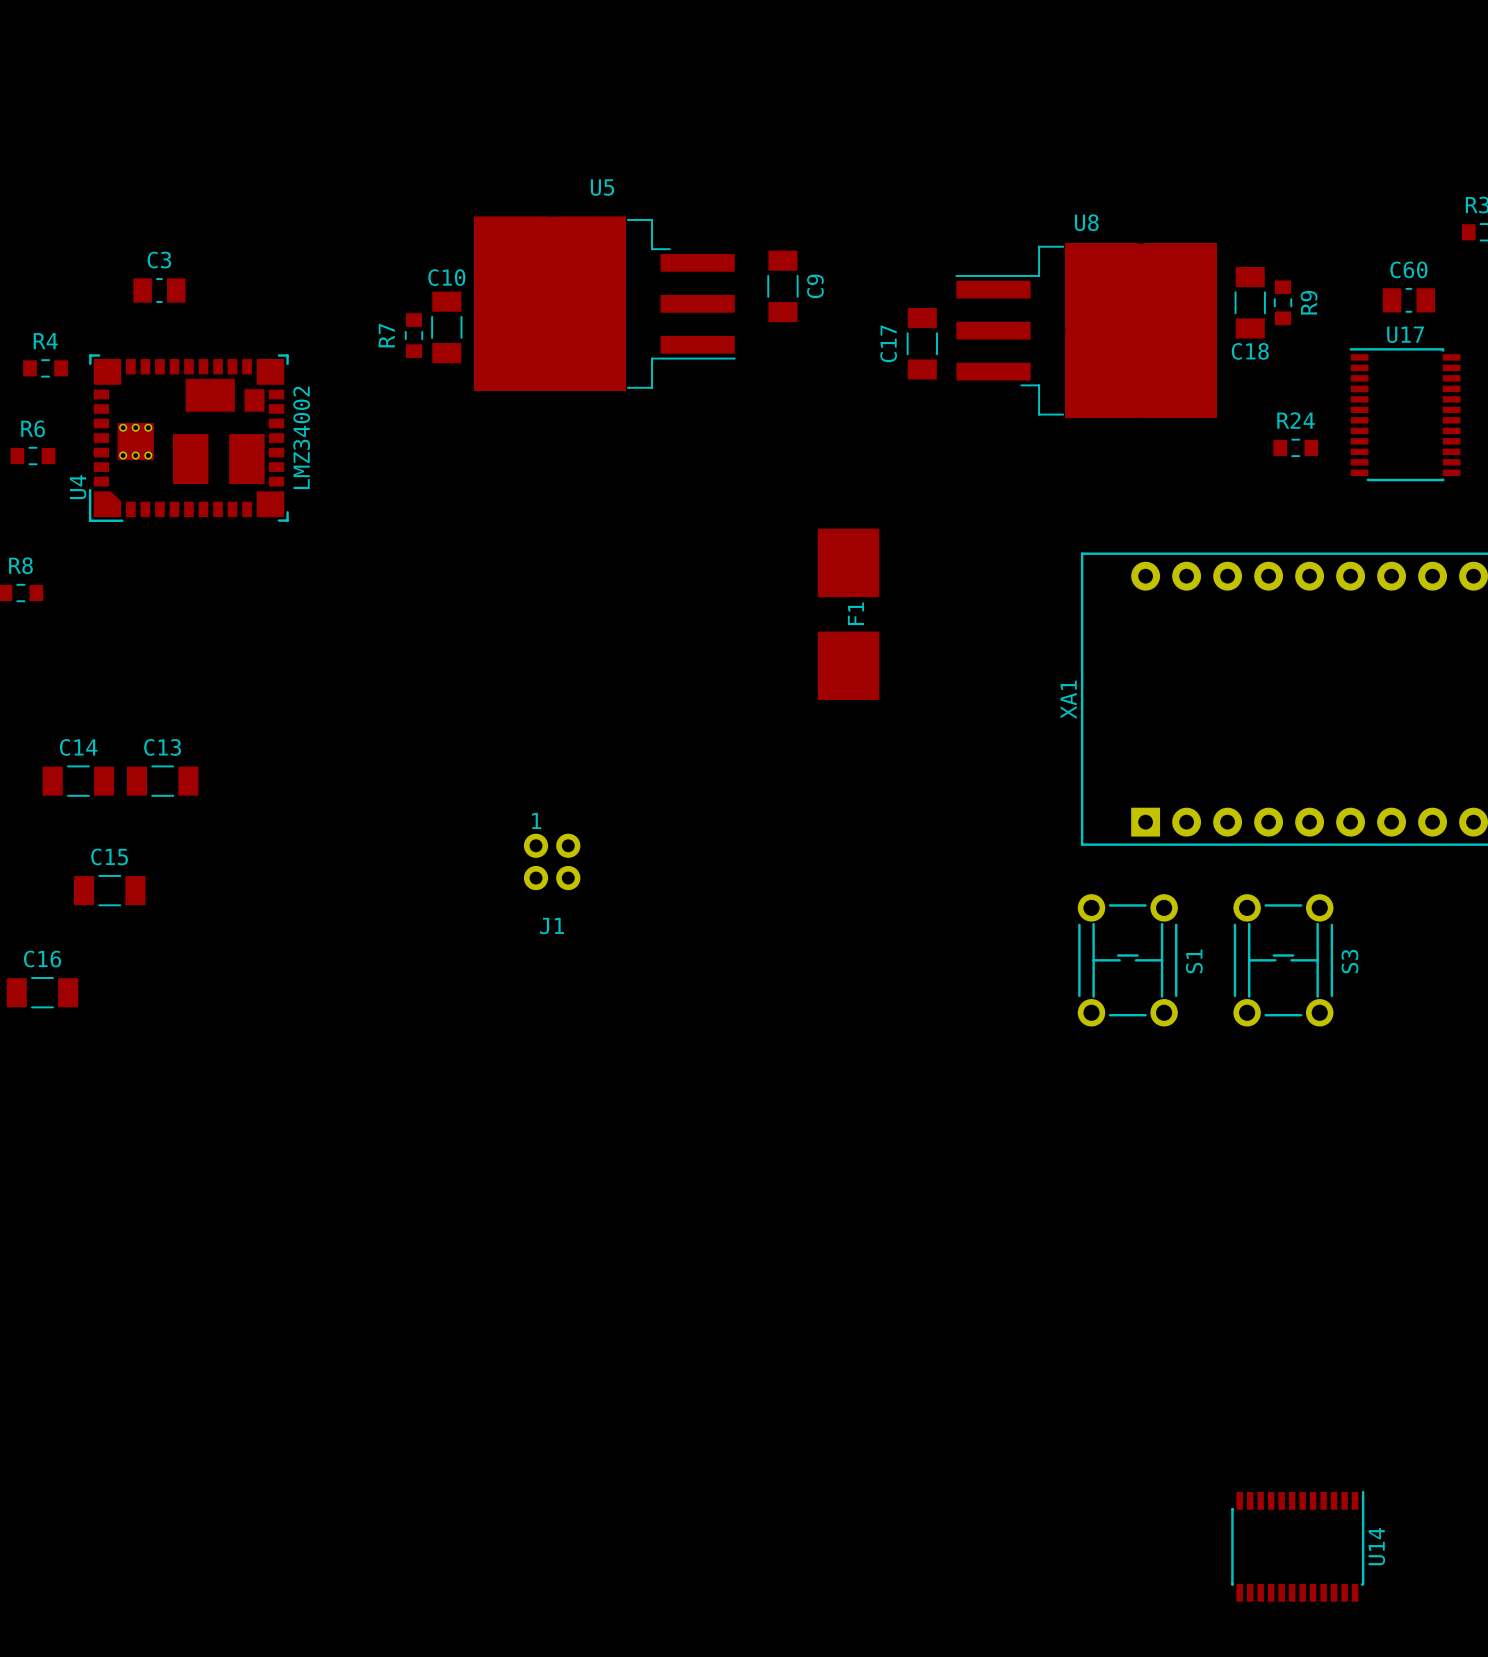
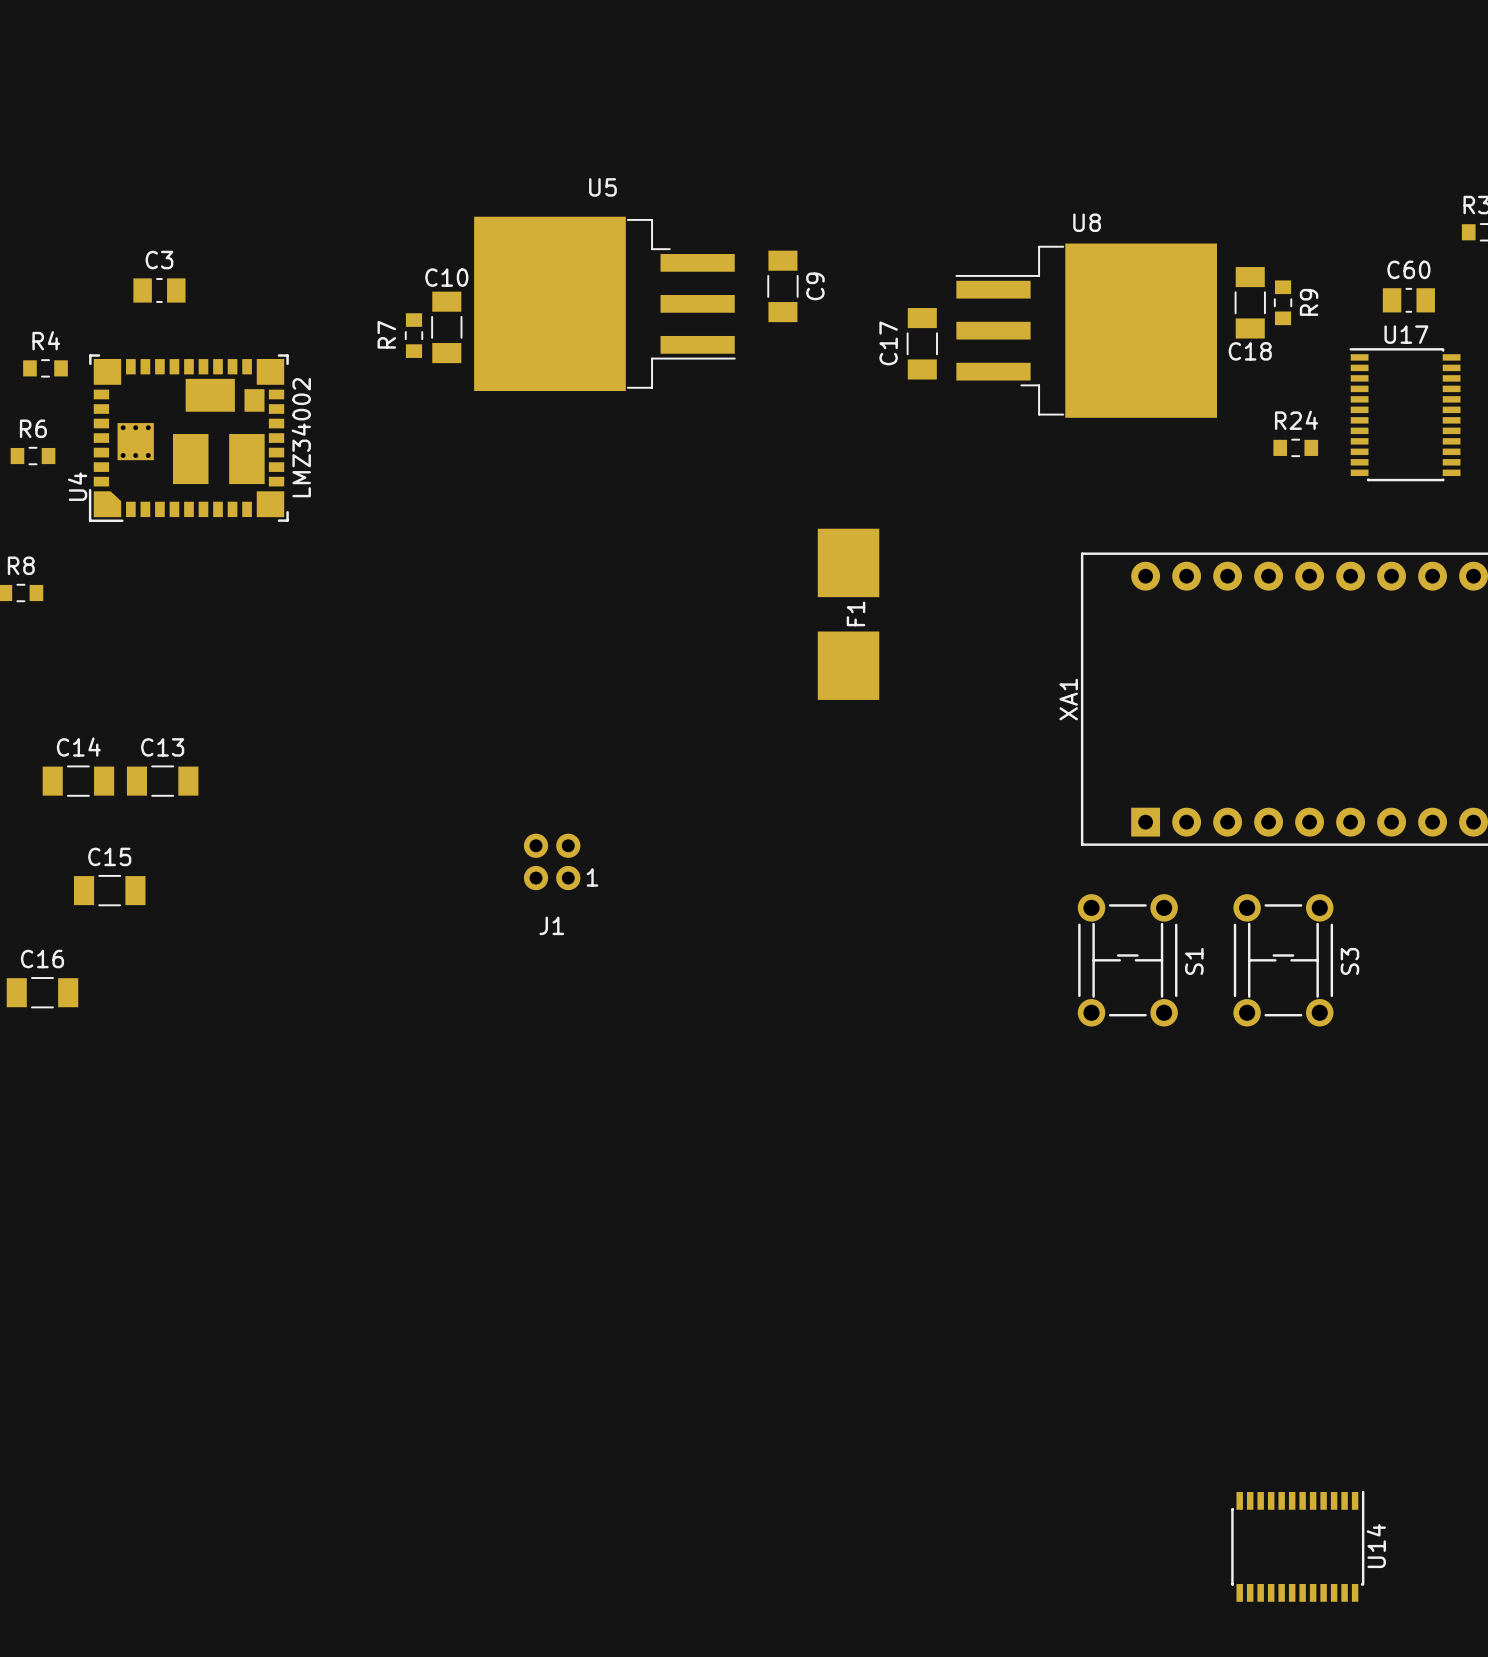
U5 footprint: [474, 216, 736, 392] -> [474, 216, 736, 392]
U8 footprint: [955, 243, 1218, 418] -> [955, 243, 1218, 418]
J1 text position: 1 (536, 820) -> 1 (592, 877)

